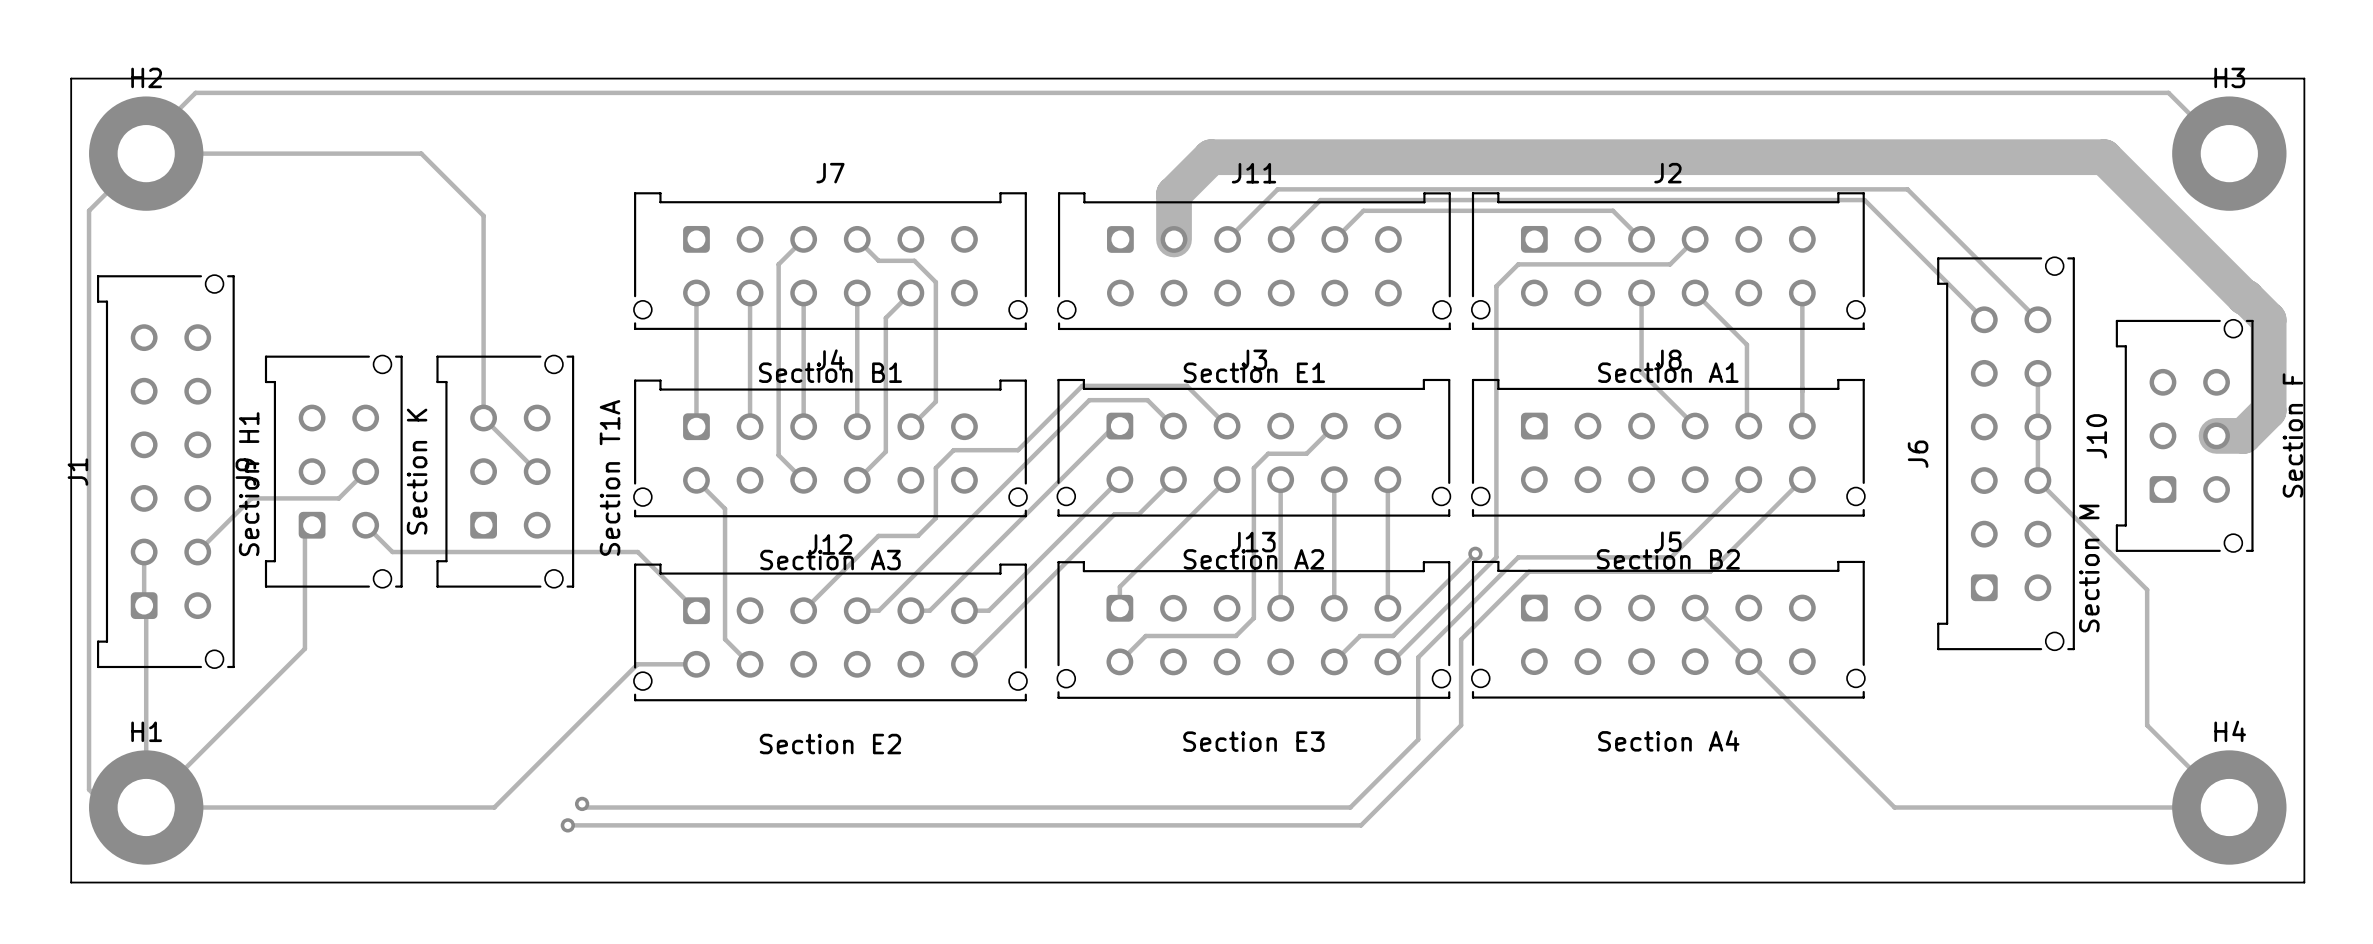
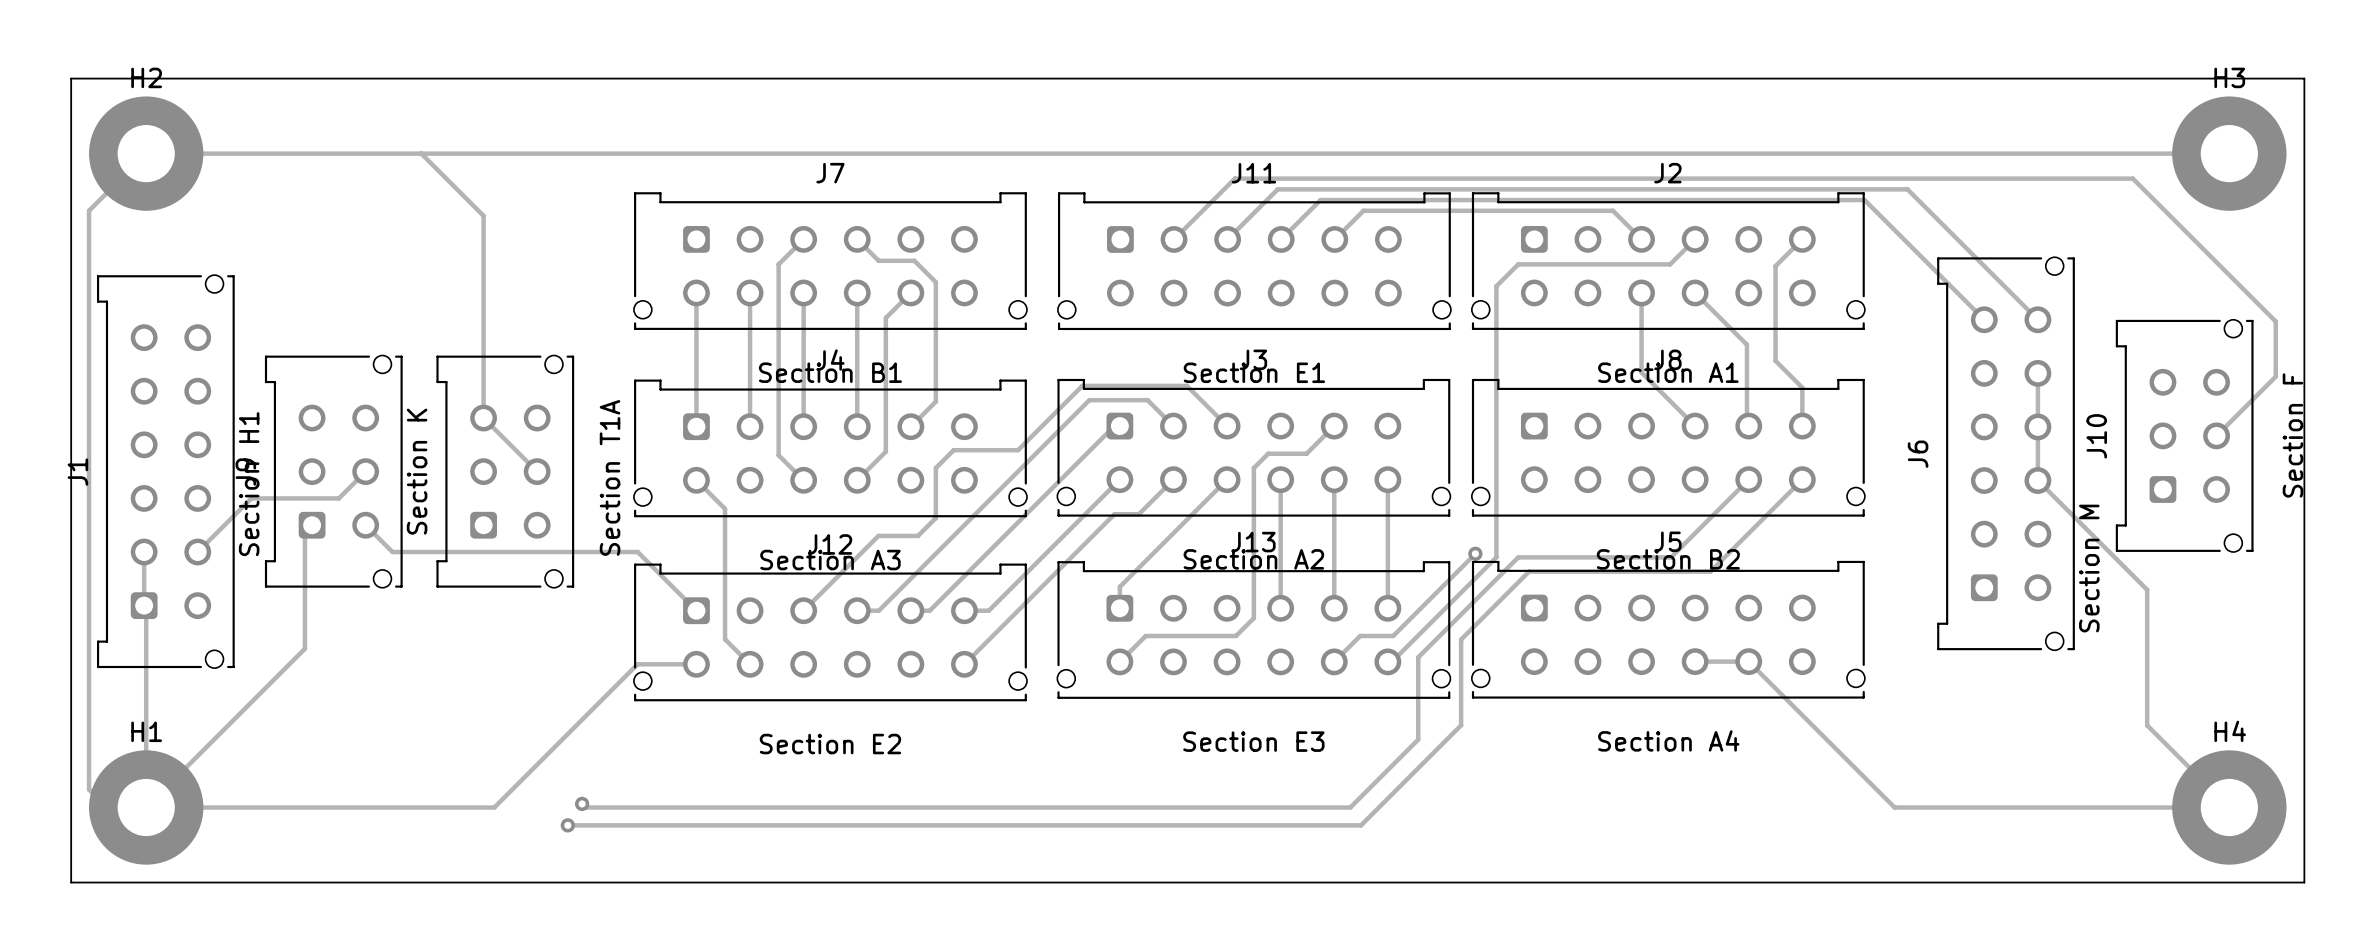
track: (140, 147) (195, 92) (2168, 92) (2229, 153) -> (421, 153) (2229, 153)
track: (1174, 239) (1174, 194) (1210, 157) (2104, 157) (2268, 319) (2268, 410) (2243, 435) (2216, 435) -> (1174, 239) (1234, 178) (2132, 178) (2275, 321) (2275, 376) (2216, 435)
track: (1802, 292) (1802, 387) -> (1802, 239) (1775, 266) (1775, 360) (1802, 387)
track: (1695, 608) (1748, 661) -> (1695, 661) (1748, 661)

